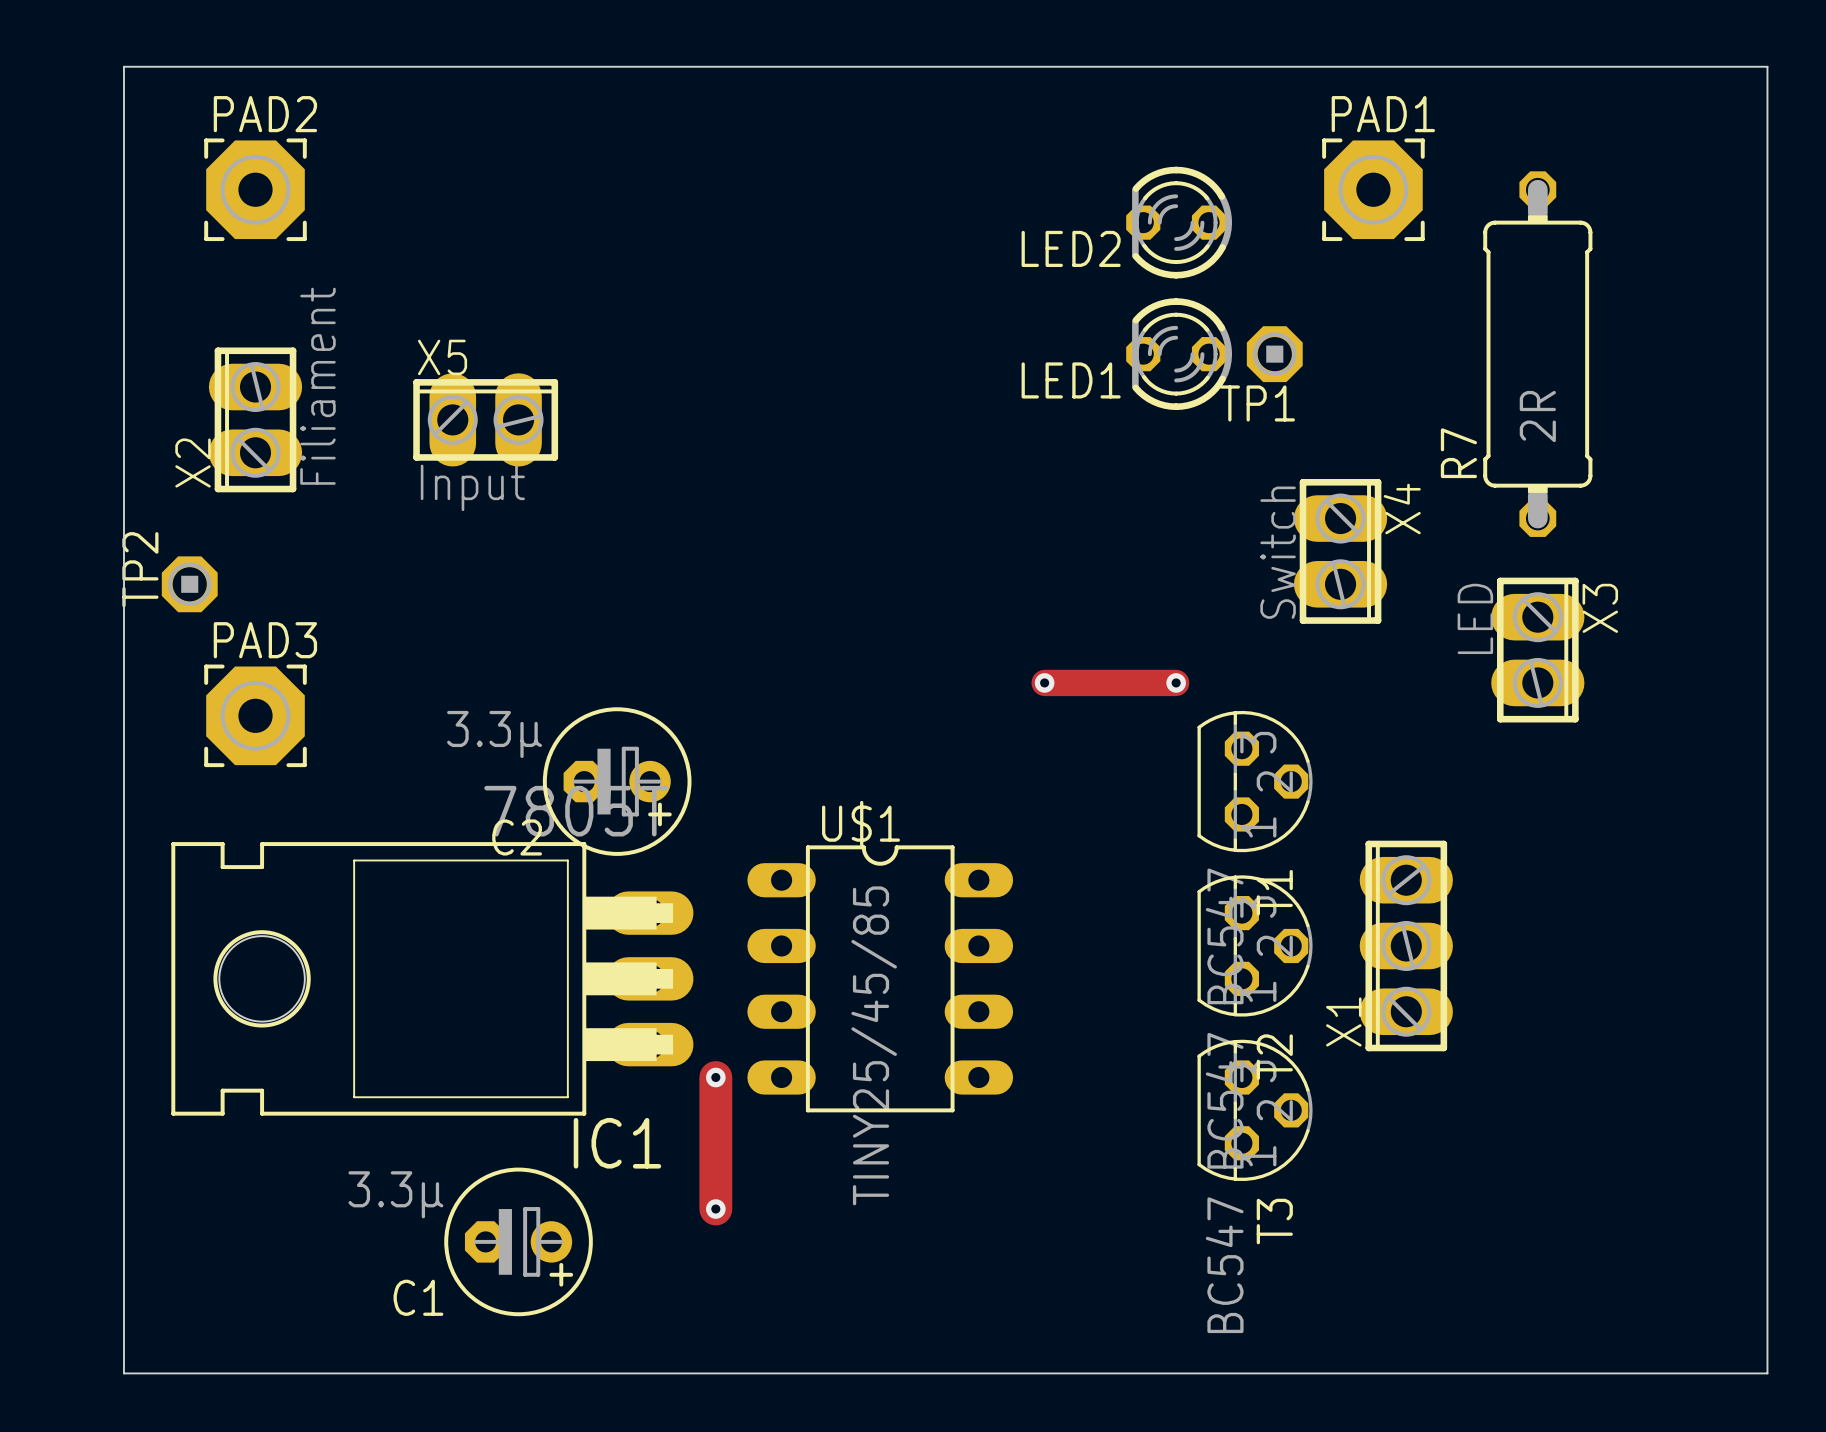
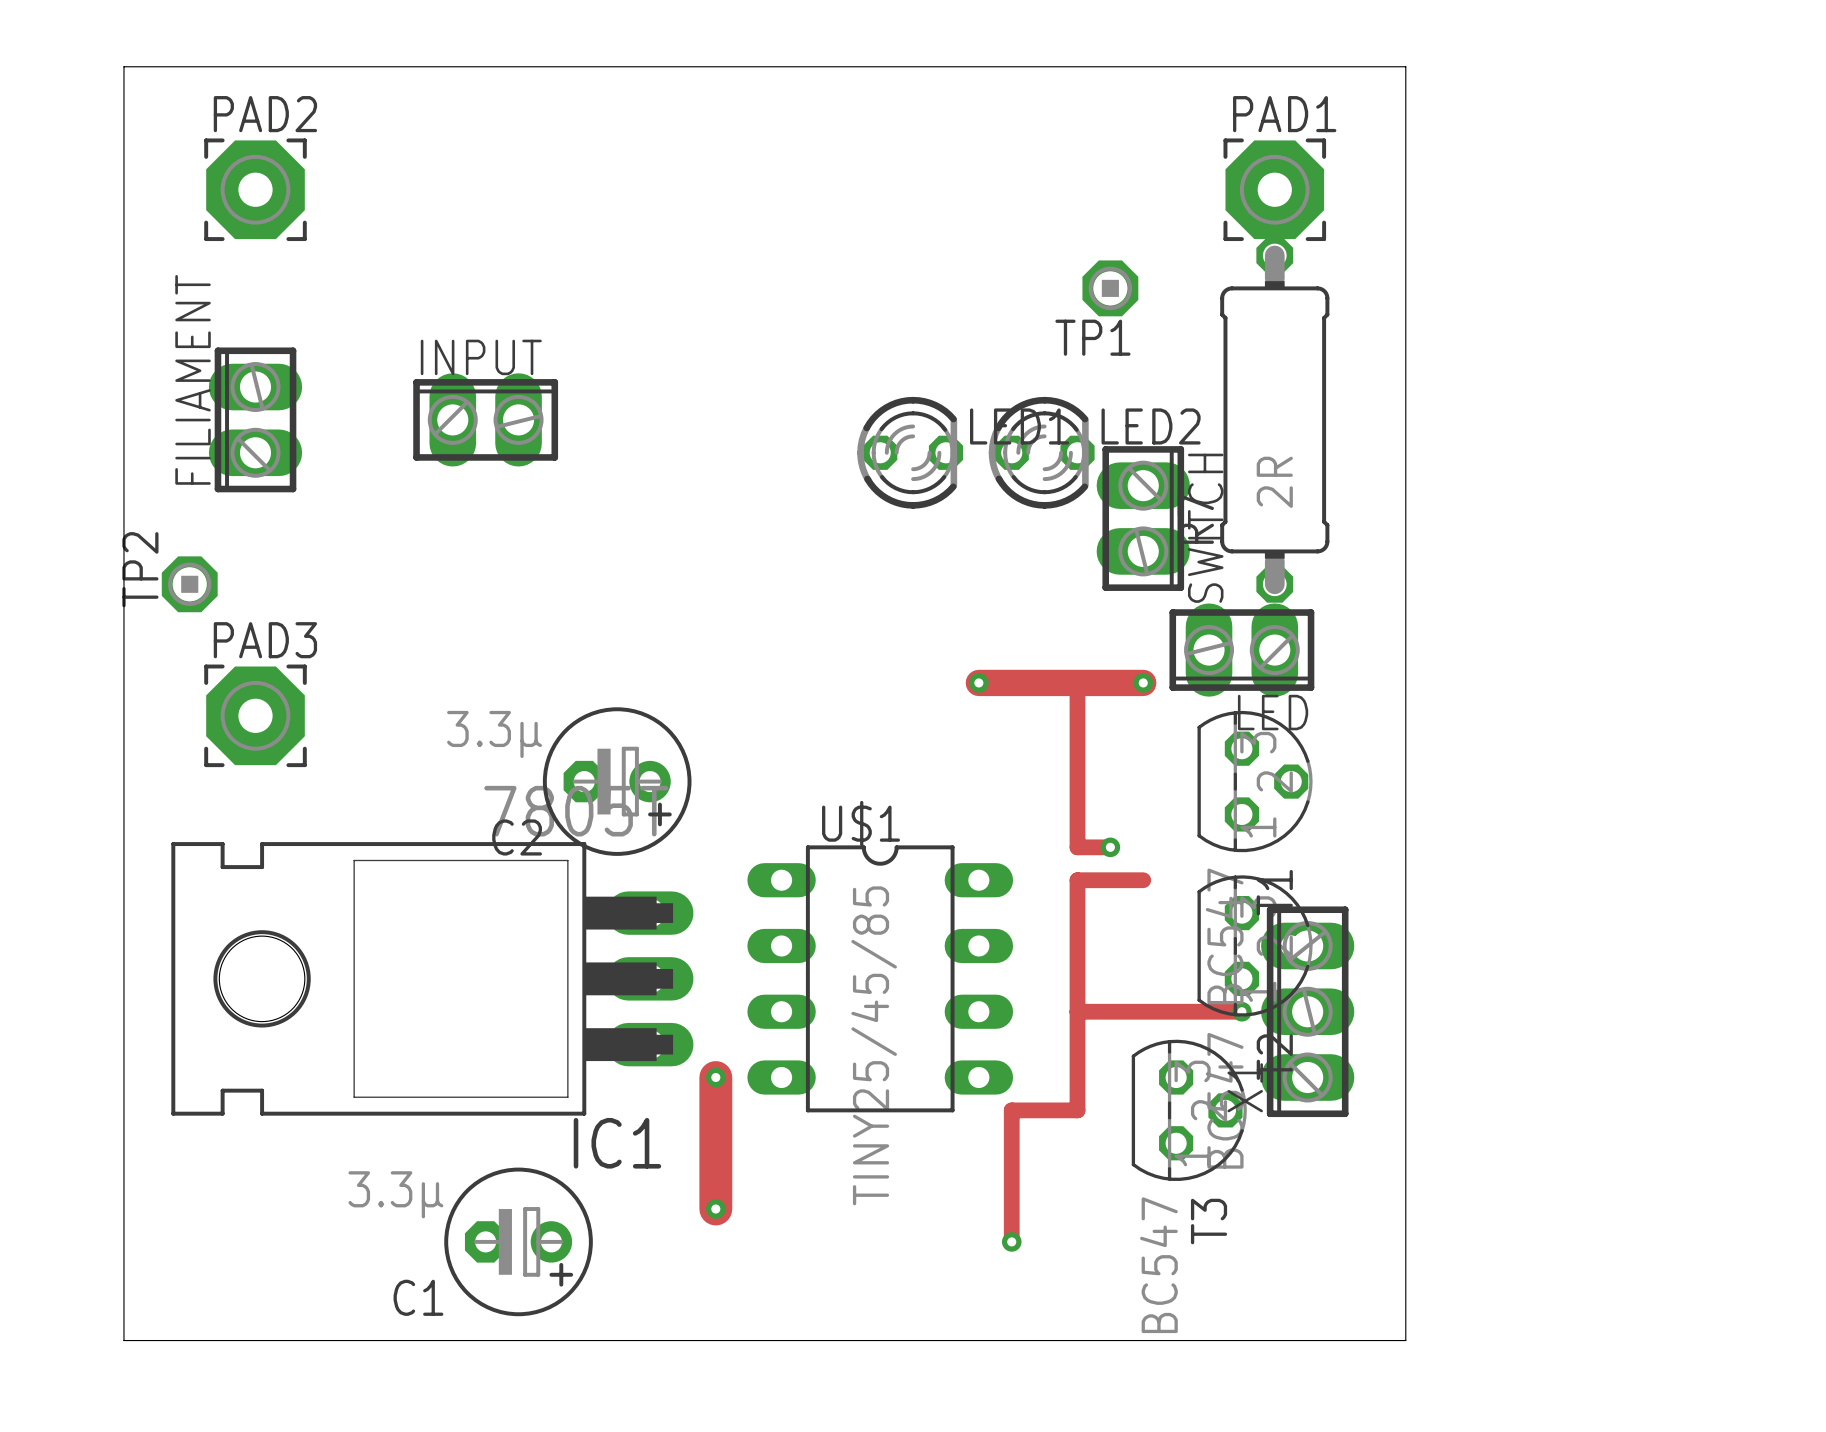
board edge: (1405, 66) (1767, 66) (1767, 1373) (123, 1373) (123, 1340) -> (1405, 66) (1405, 1340) (123, 1340)
PAD1 position: (1373, 189) -> (1274, 189)
LED2 rotation: 0° (1179, 222) -> 180° (1041, 452)
LED2 position: (1179, 222) -> (1041, 452)
LED1 rotation: 0° (1179, 354) -> 180° (910, 452)
LED1 position: (1179, 354) -> (910, 452)
TP1 position: (1274, 354) -> (1110, 288)
R7 position: (1537, 354) -> (1274, 419)
X5 name: X5 (442, 357) -> INPUT (481, 357)
X2 value: Filiament (317, 386) -> none
X2 name: X2 (193, 463) -> FILIAMENT (193, 379)
X5 value: Input (472, 487) -> none
SWITCH: none -> (1143, 518)
X4: Switch (1340, 551) -> none
LED: none -> (1241, 650)
X3: LED (1537, 650) -> none
track: none -> (978, 682) (1044, 682)
via: none -> (978, 682)
via: (1044, 682) -> none
track: (1143, 682) (1176, 682) -> (1143, 682) (1077, 682) (1077, 847) (1110, 847)
via position: (1176, 682) -> (1143, 682)
via: none -> (1110, 847)
track: none -> (1143, 880) (1077, 880) (1077, 1110) (1011, 1110) (1011, 1241)
X1 position: (1406, 945) -> (1307, 1011)
track: none -> (1077, 1011) (1241, 1011)
via: none -> (1241, 1011)
T3 position: (1255, 1110) -> (1189, 1110)
via: none -> (1011, 1241)

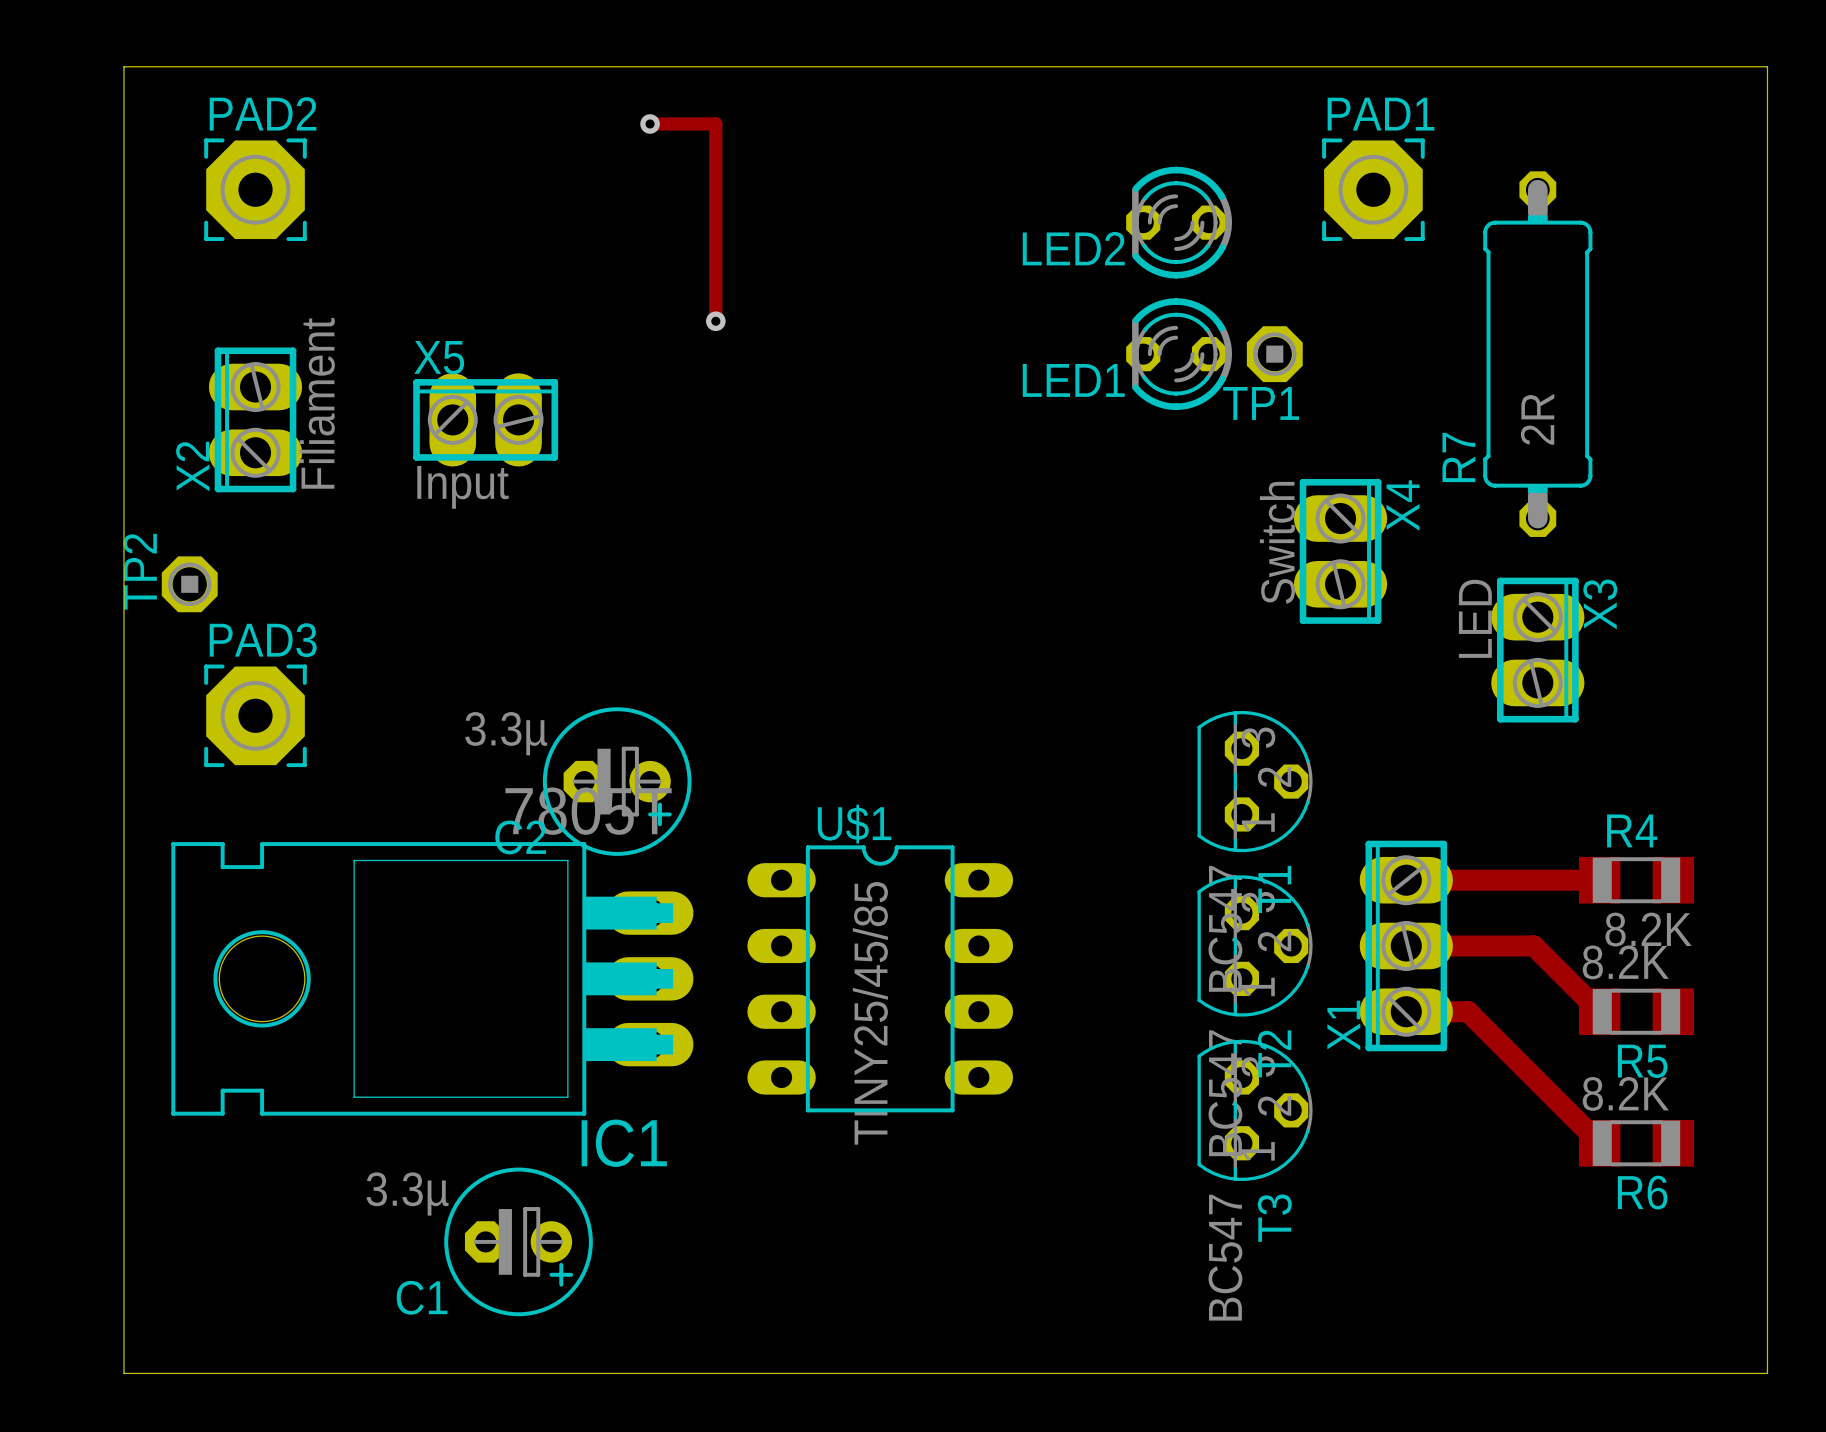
board edge: (1405, 66) (1405, 1340) (123, 1340) -> (1405, 66) (1767, 66) (1767, 1373) (123, 1373) (123, 1340)
track: none -> (650, 123) (715, 123) (715, 321)
via: none -> (650, 123)
PAD1 position: (1274, 189) -> (1373, 189)
TP1 position: (1110, 288) -> (1274, 354)
via: none -> (715, 321)
INPUT name: INPUT (481, 357) -> X5 (439, 357)
FILIAMENT name: FILIAMENT (193, 379) -> X2 (192, 466)
FILIAMENT value: none -> Filiament (317, 403)
R7 position: (1274, 419) -> (1537, 354)
LED1 rotation: 0° (910, 452) -> 180° (1179, 354)
LED1 position: (910, 452) -> (1179, 354)
LED2 rotation: 0° (1041, 452) -> 180° (1179, 222)
LED2 position: (1041, 452) -> (1179, 222)
INPUT value: none -> Input (462, 487)
SWITCH: (1143, 518) -> none
X4: none -> Switch (1340, 551)
LED: (1241, 650) -> none
X3: none -> LED (1537, 650)
track: (978, 682) (1143, 682) (1077, 682) (1077, 847) (1110, 847) -> none
via: (978, 682) -> none
via: (1143, 682) -> none
via: (1110, 847) -> none
track: (1143, 880) (1077, 880) (1077, 1110) (1011, 1110) (1011, 1241) -> none
track: none -> (1406, 880) (1599, 880)
R4: none -> 8.2K (1636, 880)
track: none -> (1406, 945) (1533, 945) (1599, 1011)
track: (1077, 1011) (1241, 1011) -> none
via: (1241, 1011) -> none
X1 position: (1307, 1011) -> (1406, 945)
track: none -> (1406, 1011) (1468, 1011) (1599, 1143)
R5: none -> 8.2K (1636, 1011)
track: (715, 1077) (715, 1209) -> none
via: (715, 1077) -> none
T3 position: (1189, 1110) -> (1255, 1110)
R6: none -> 8.2K (1636, 1143)
via: (715, 1209) -> none
via: (1011, 1241) -> none

